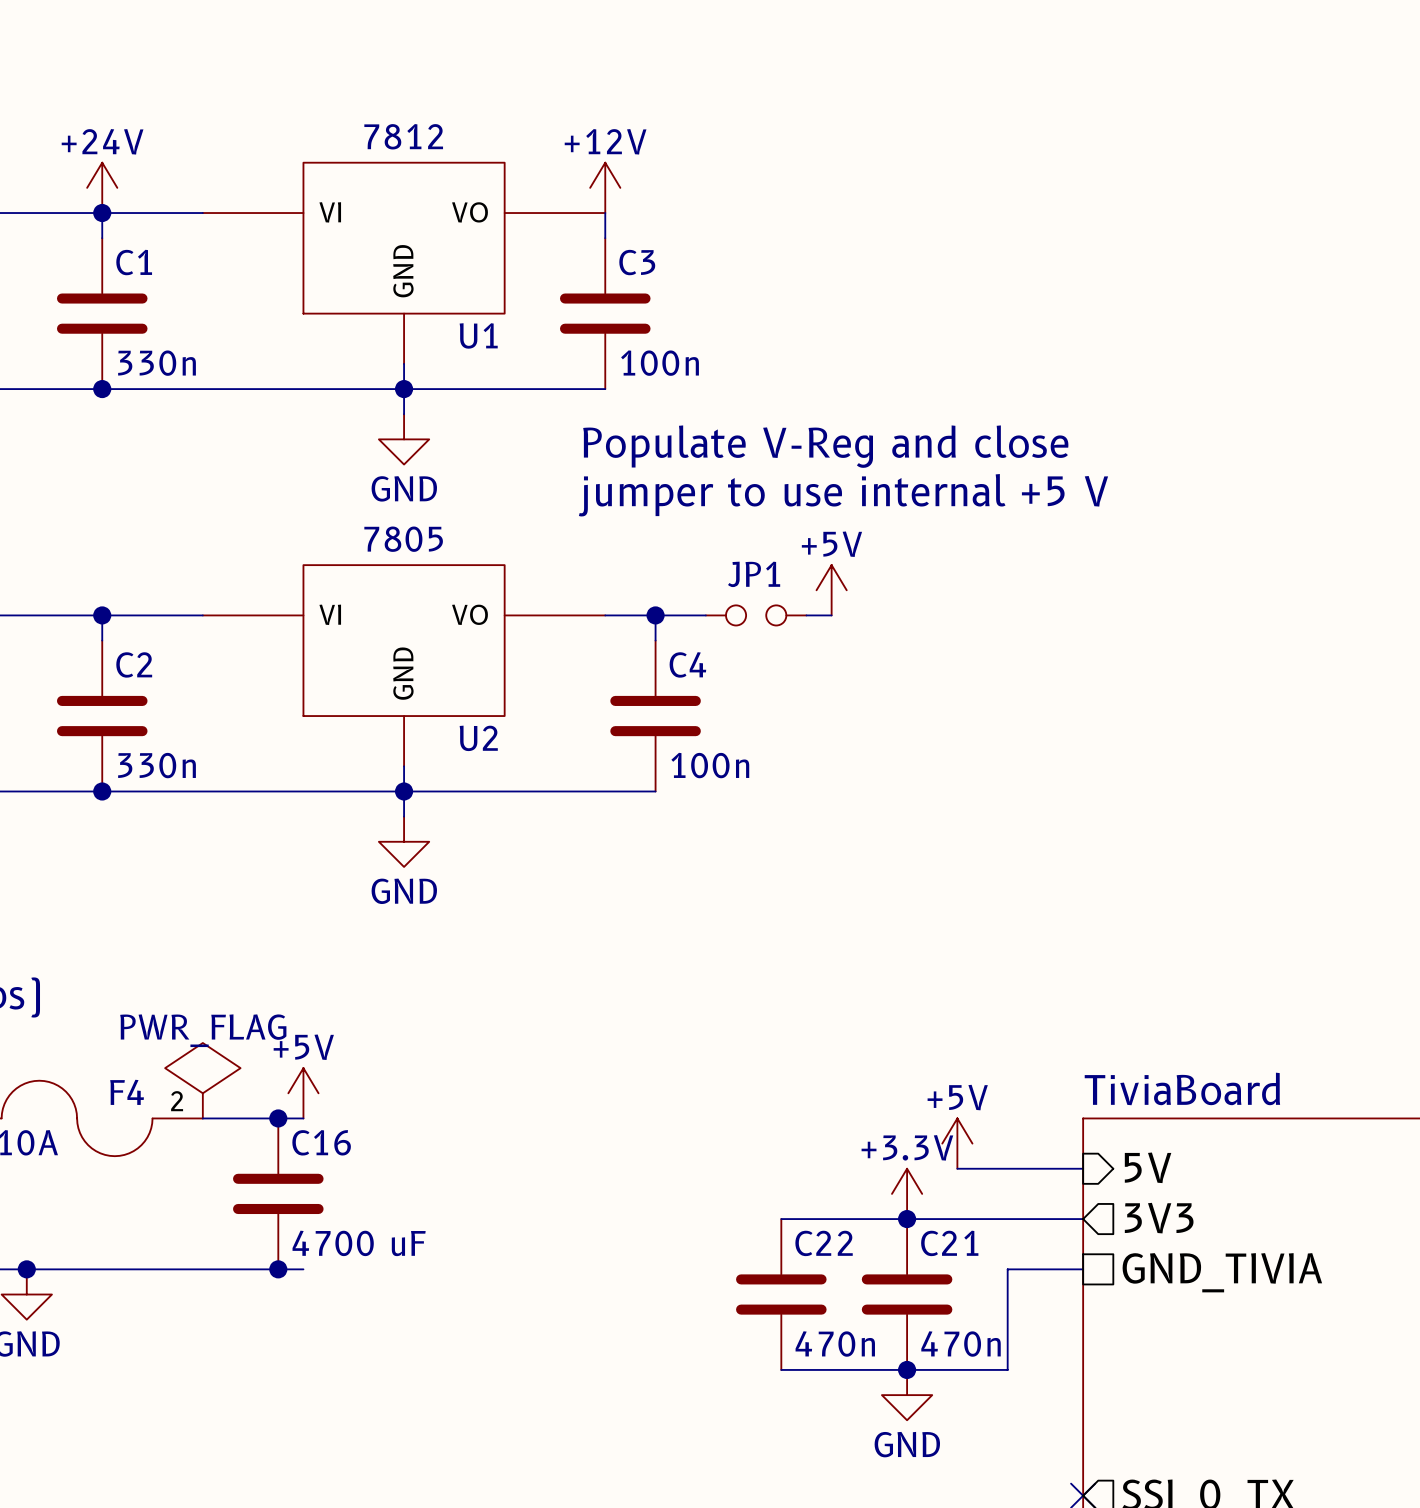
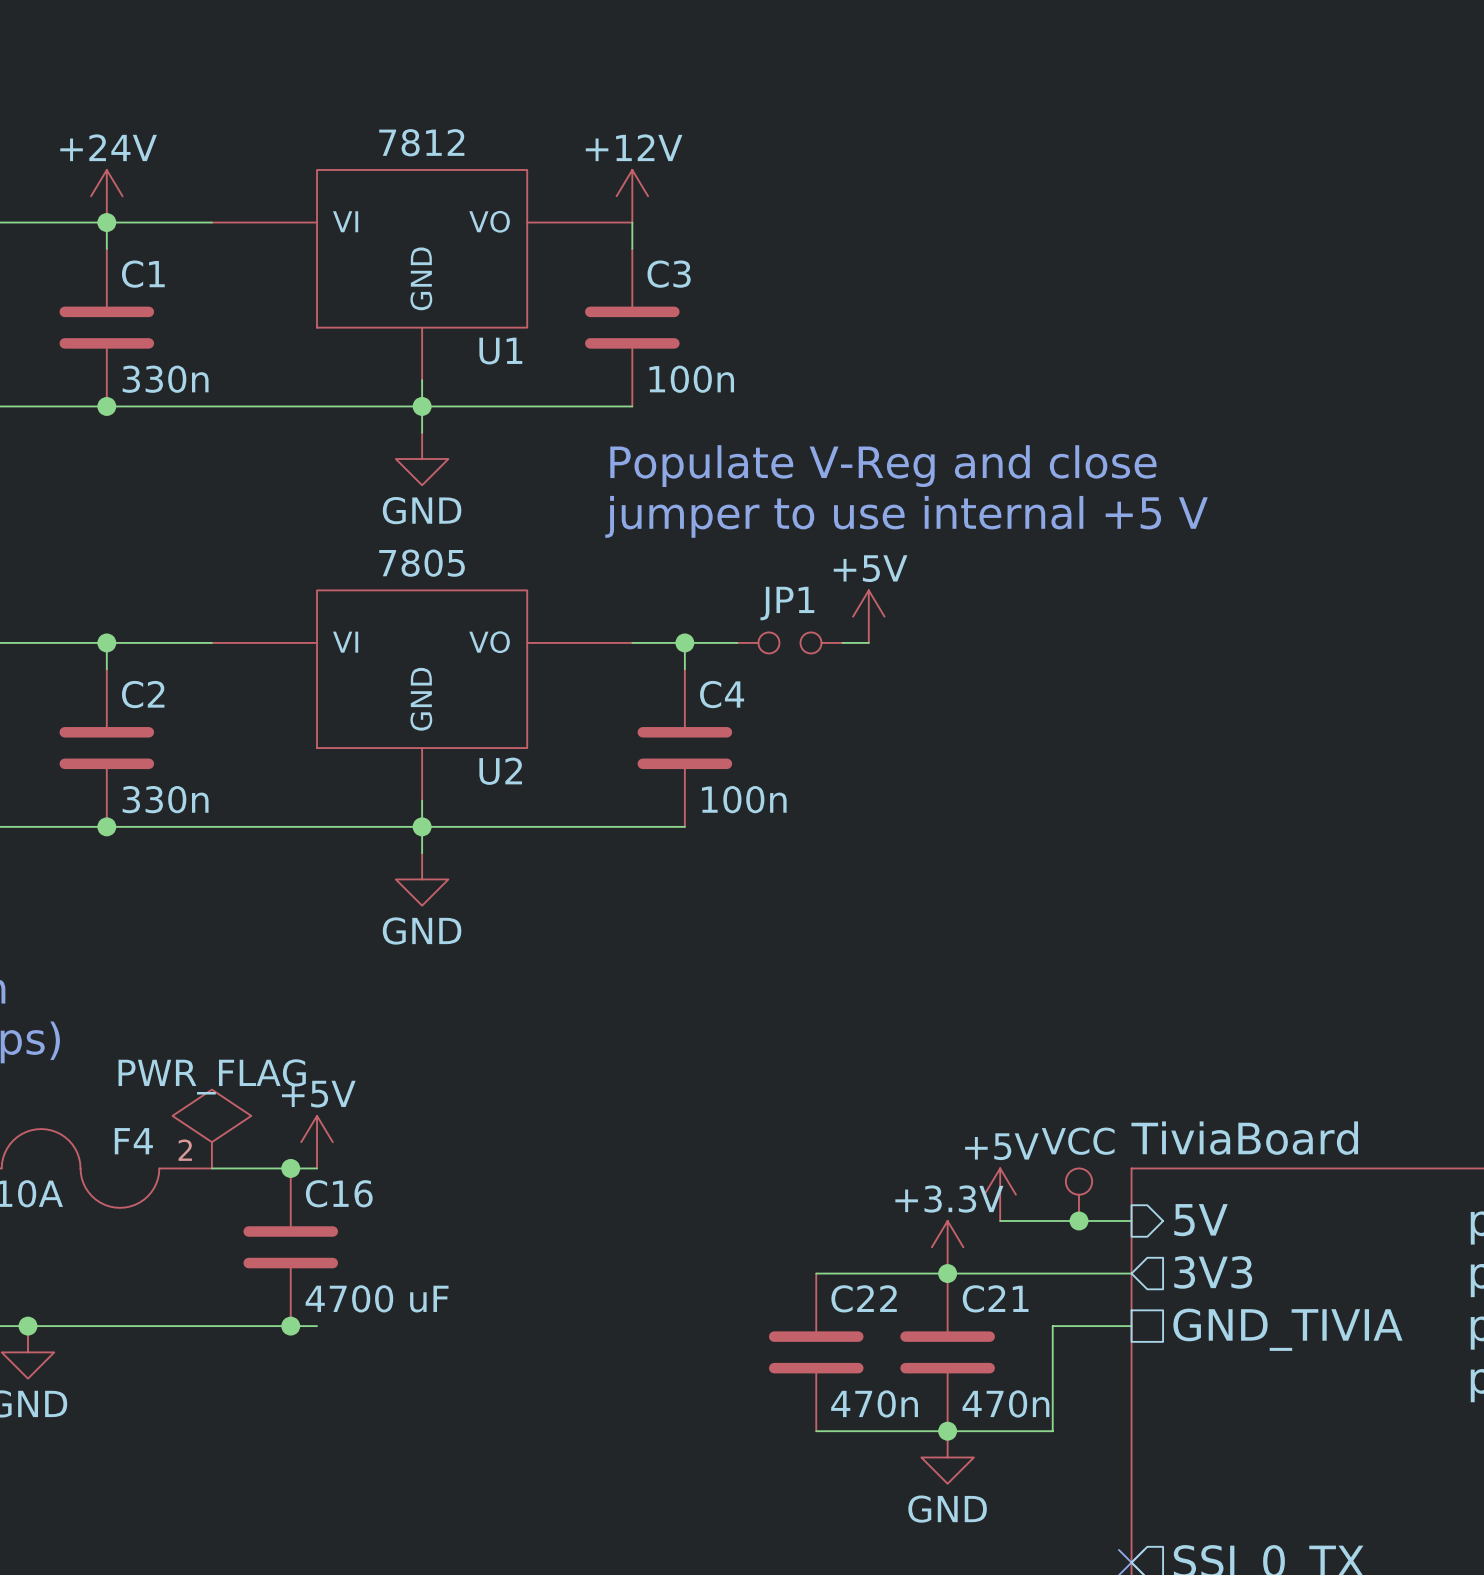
power symbol: none -> VCC (1079, 1194)
junction: none -> (1079, 1221)

